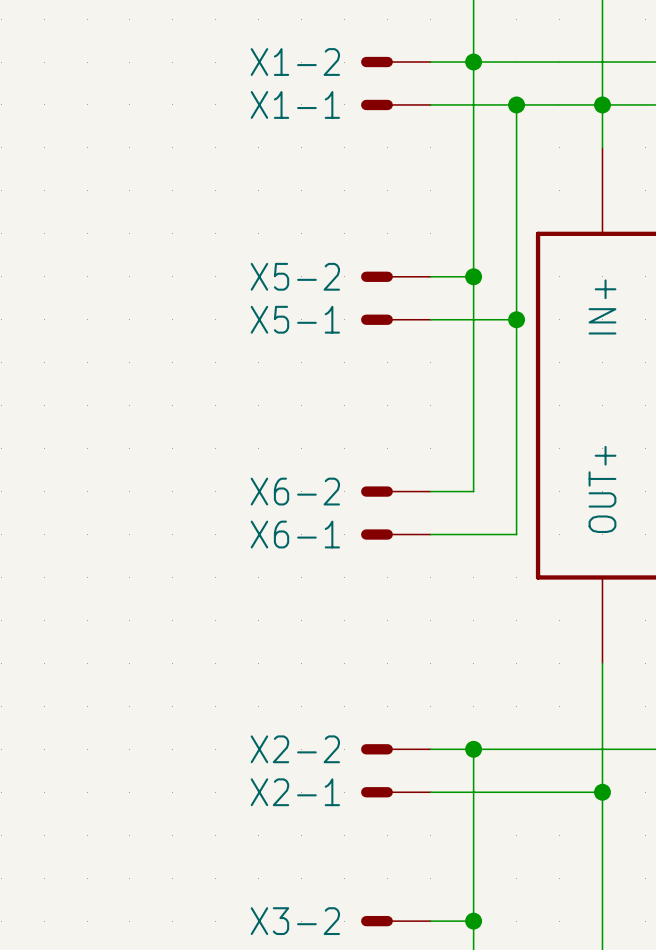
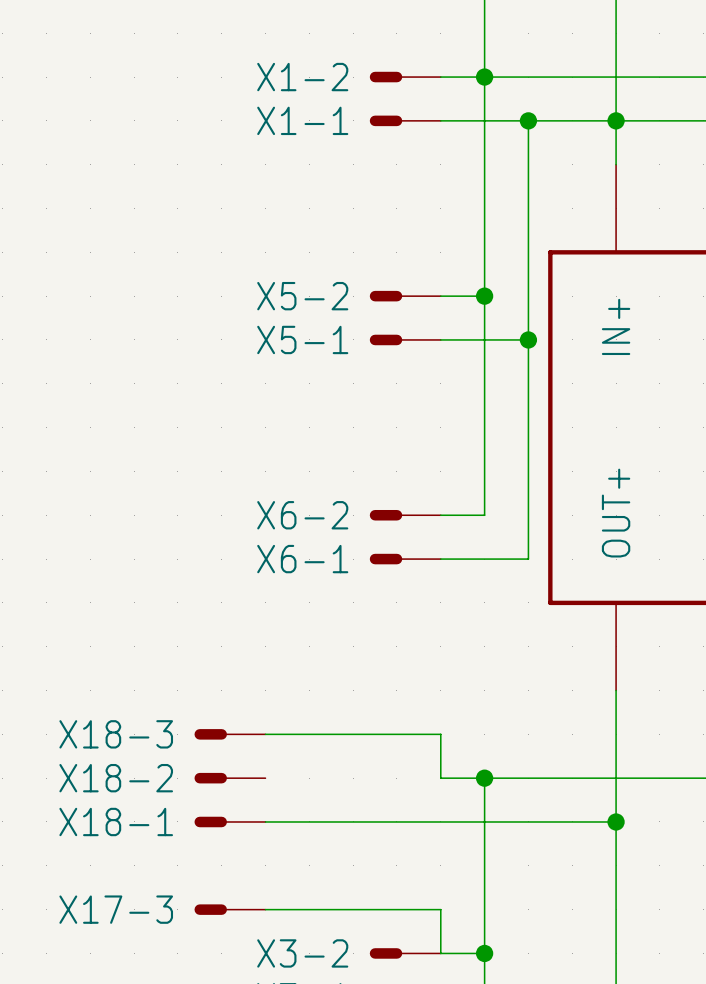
X18-3: none -> (230, 734)
wire: none -> (265, 734) (440, 734) (440, 778)
X18-2: none -> (230, 778)
X2-2: (395, 749) -> none
X18-1: none -> (230, 821)
wire: none -> (265, 821) (440, 821)
X2-1: (395, 792) -> none
X17-3: none -> (230, 909)
wire: none -> (265, 909) (440, 909) (440, 953)

